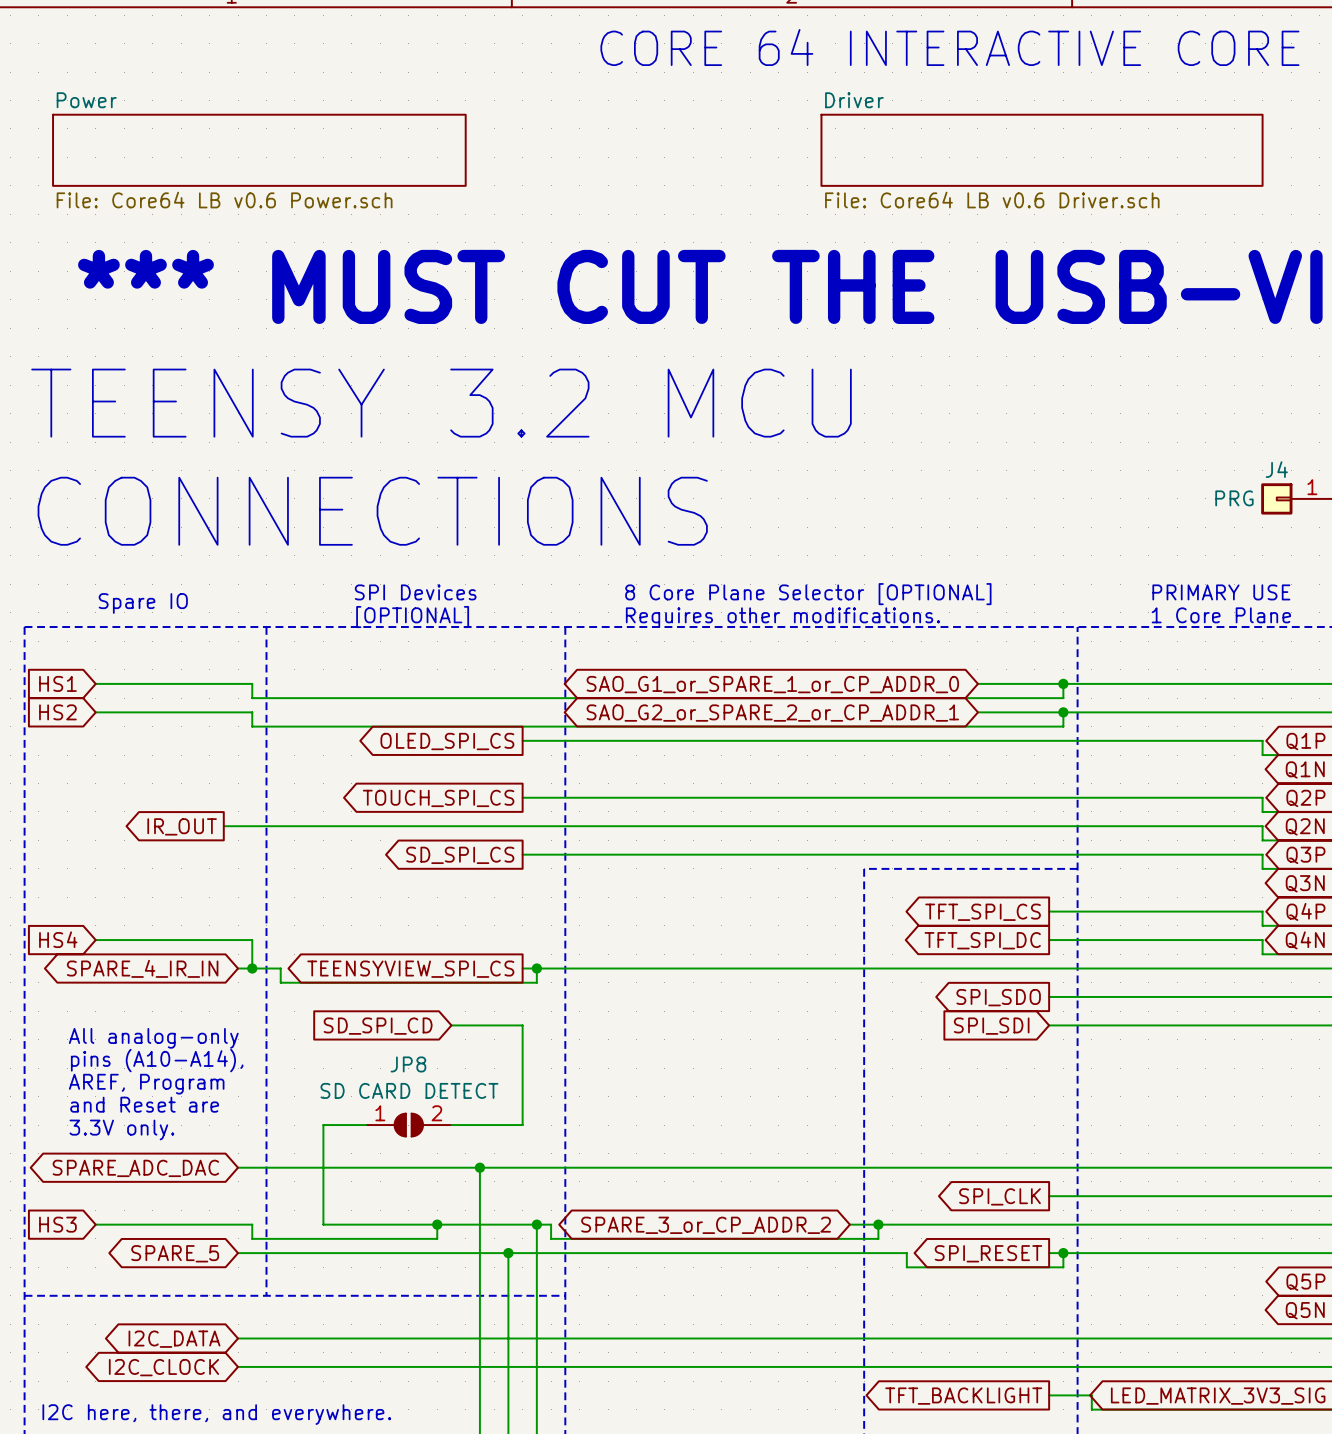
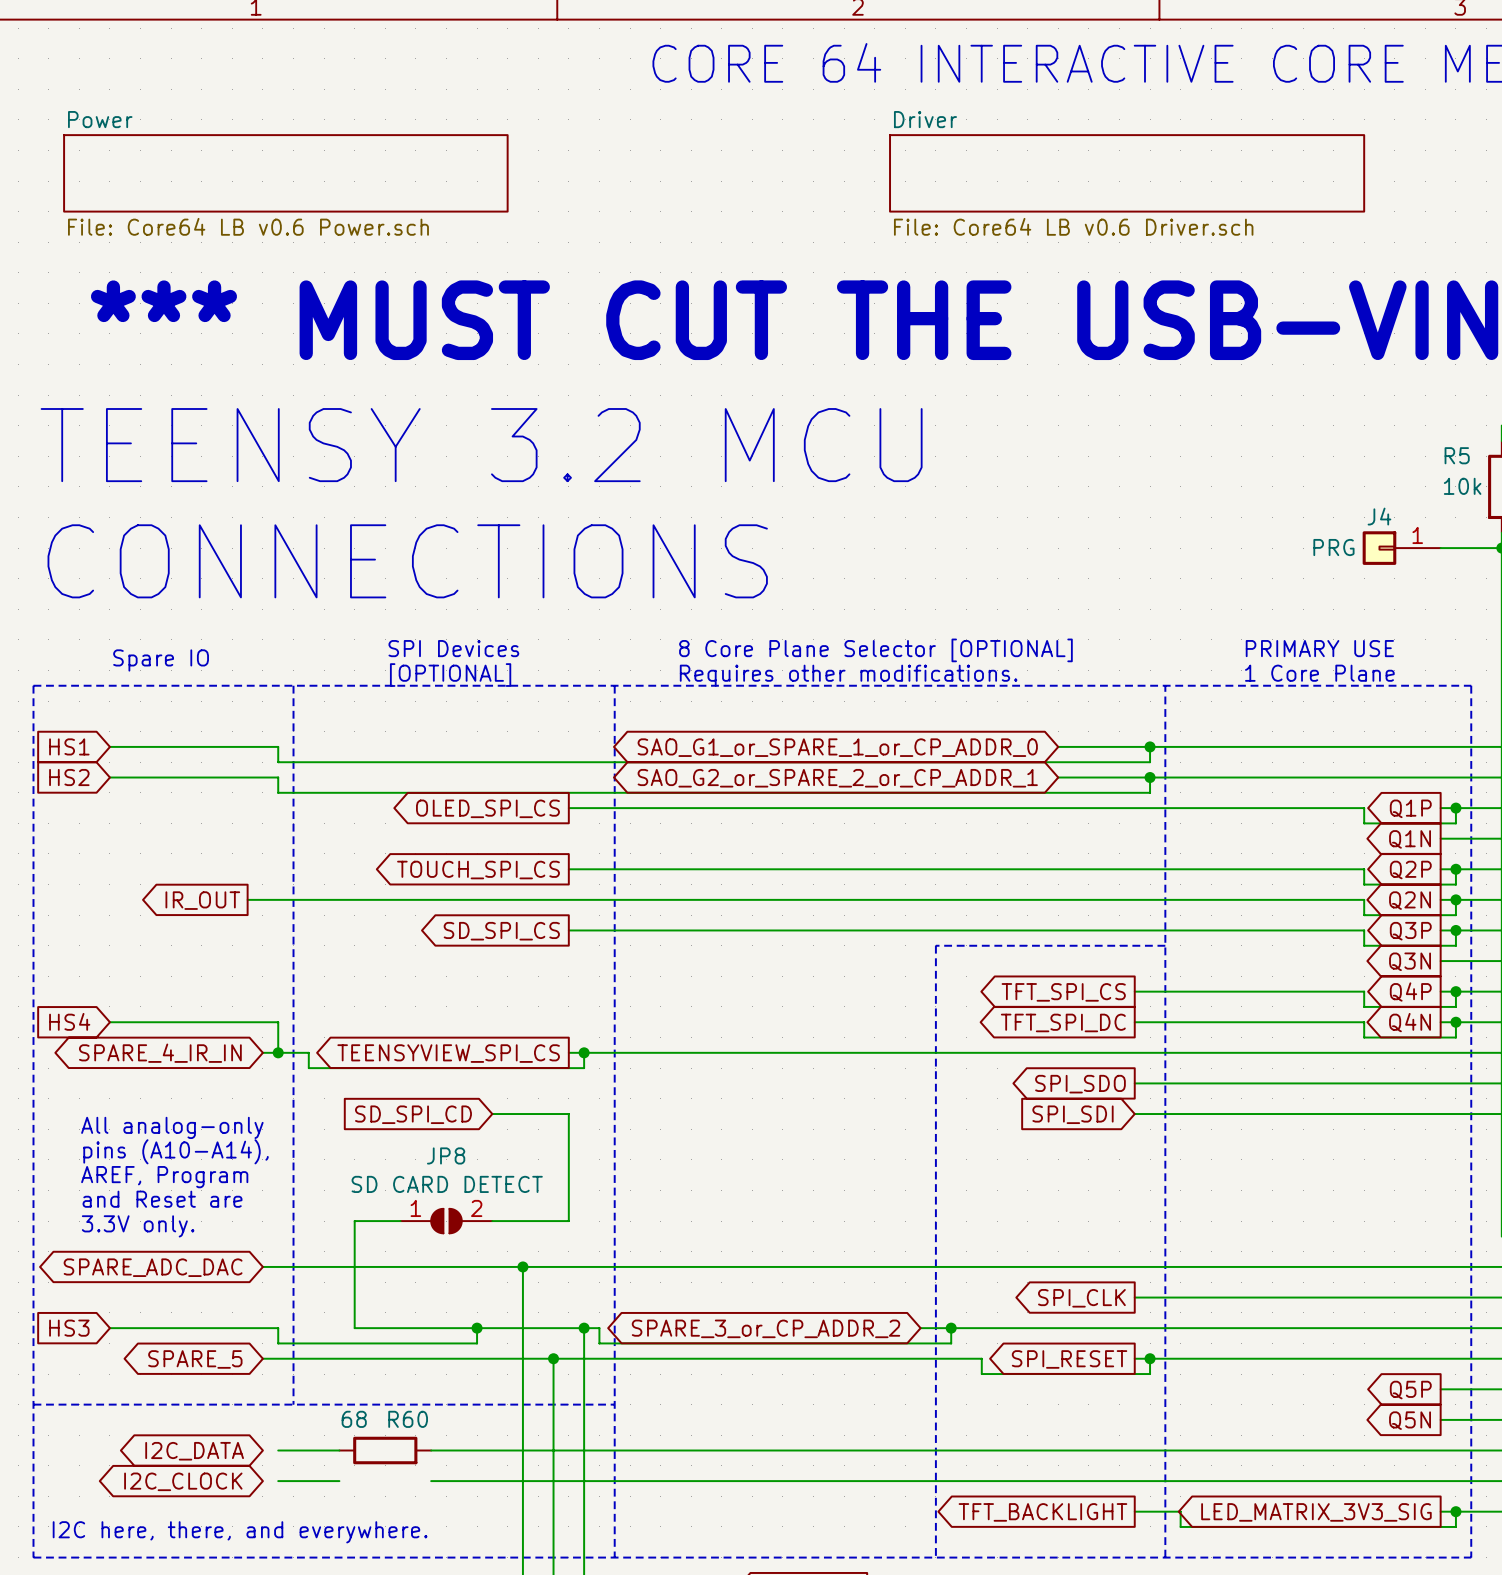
wire: (238, 1338) (252, 1338) -> none
wire: (309, 1338) (394, 1338) -> none
R60: none -> 68 (385, 1450)
wire: (238, 1366) (252, 1366) -> none
wire: (309, 1366) (394, 1366) -> none

